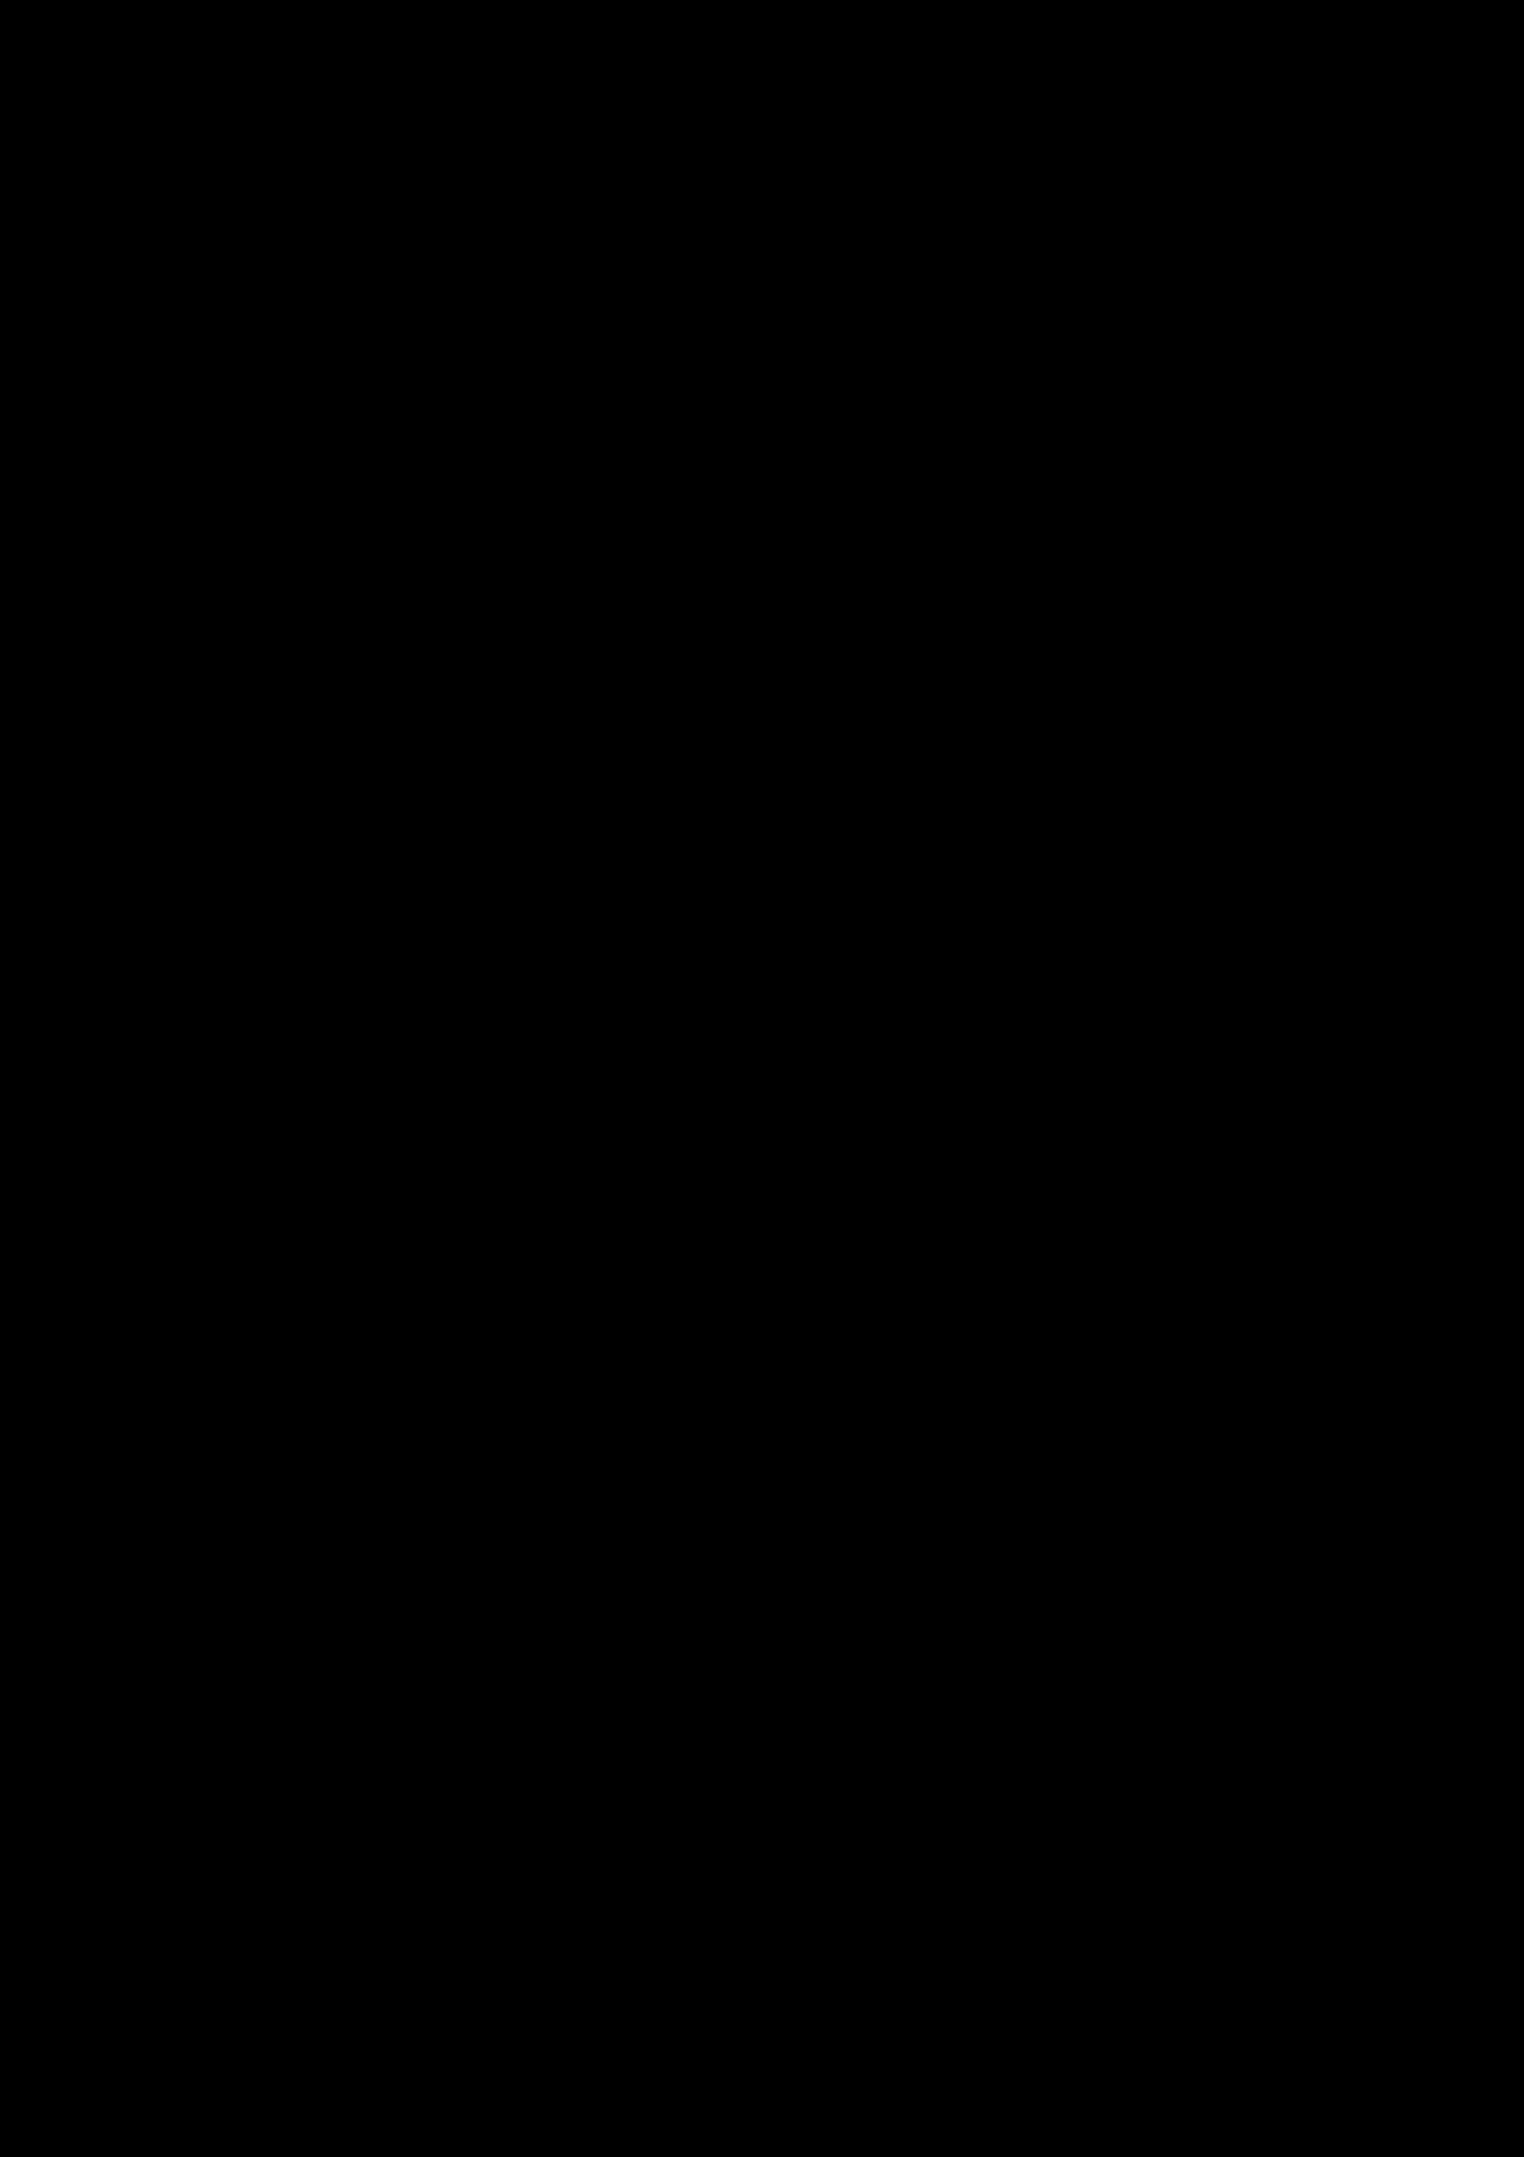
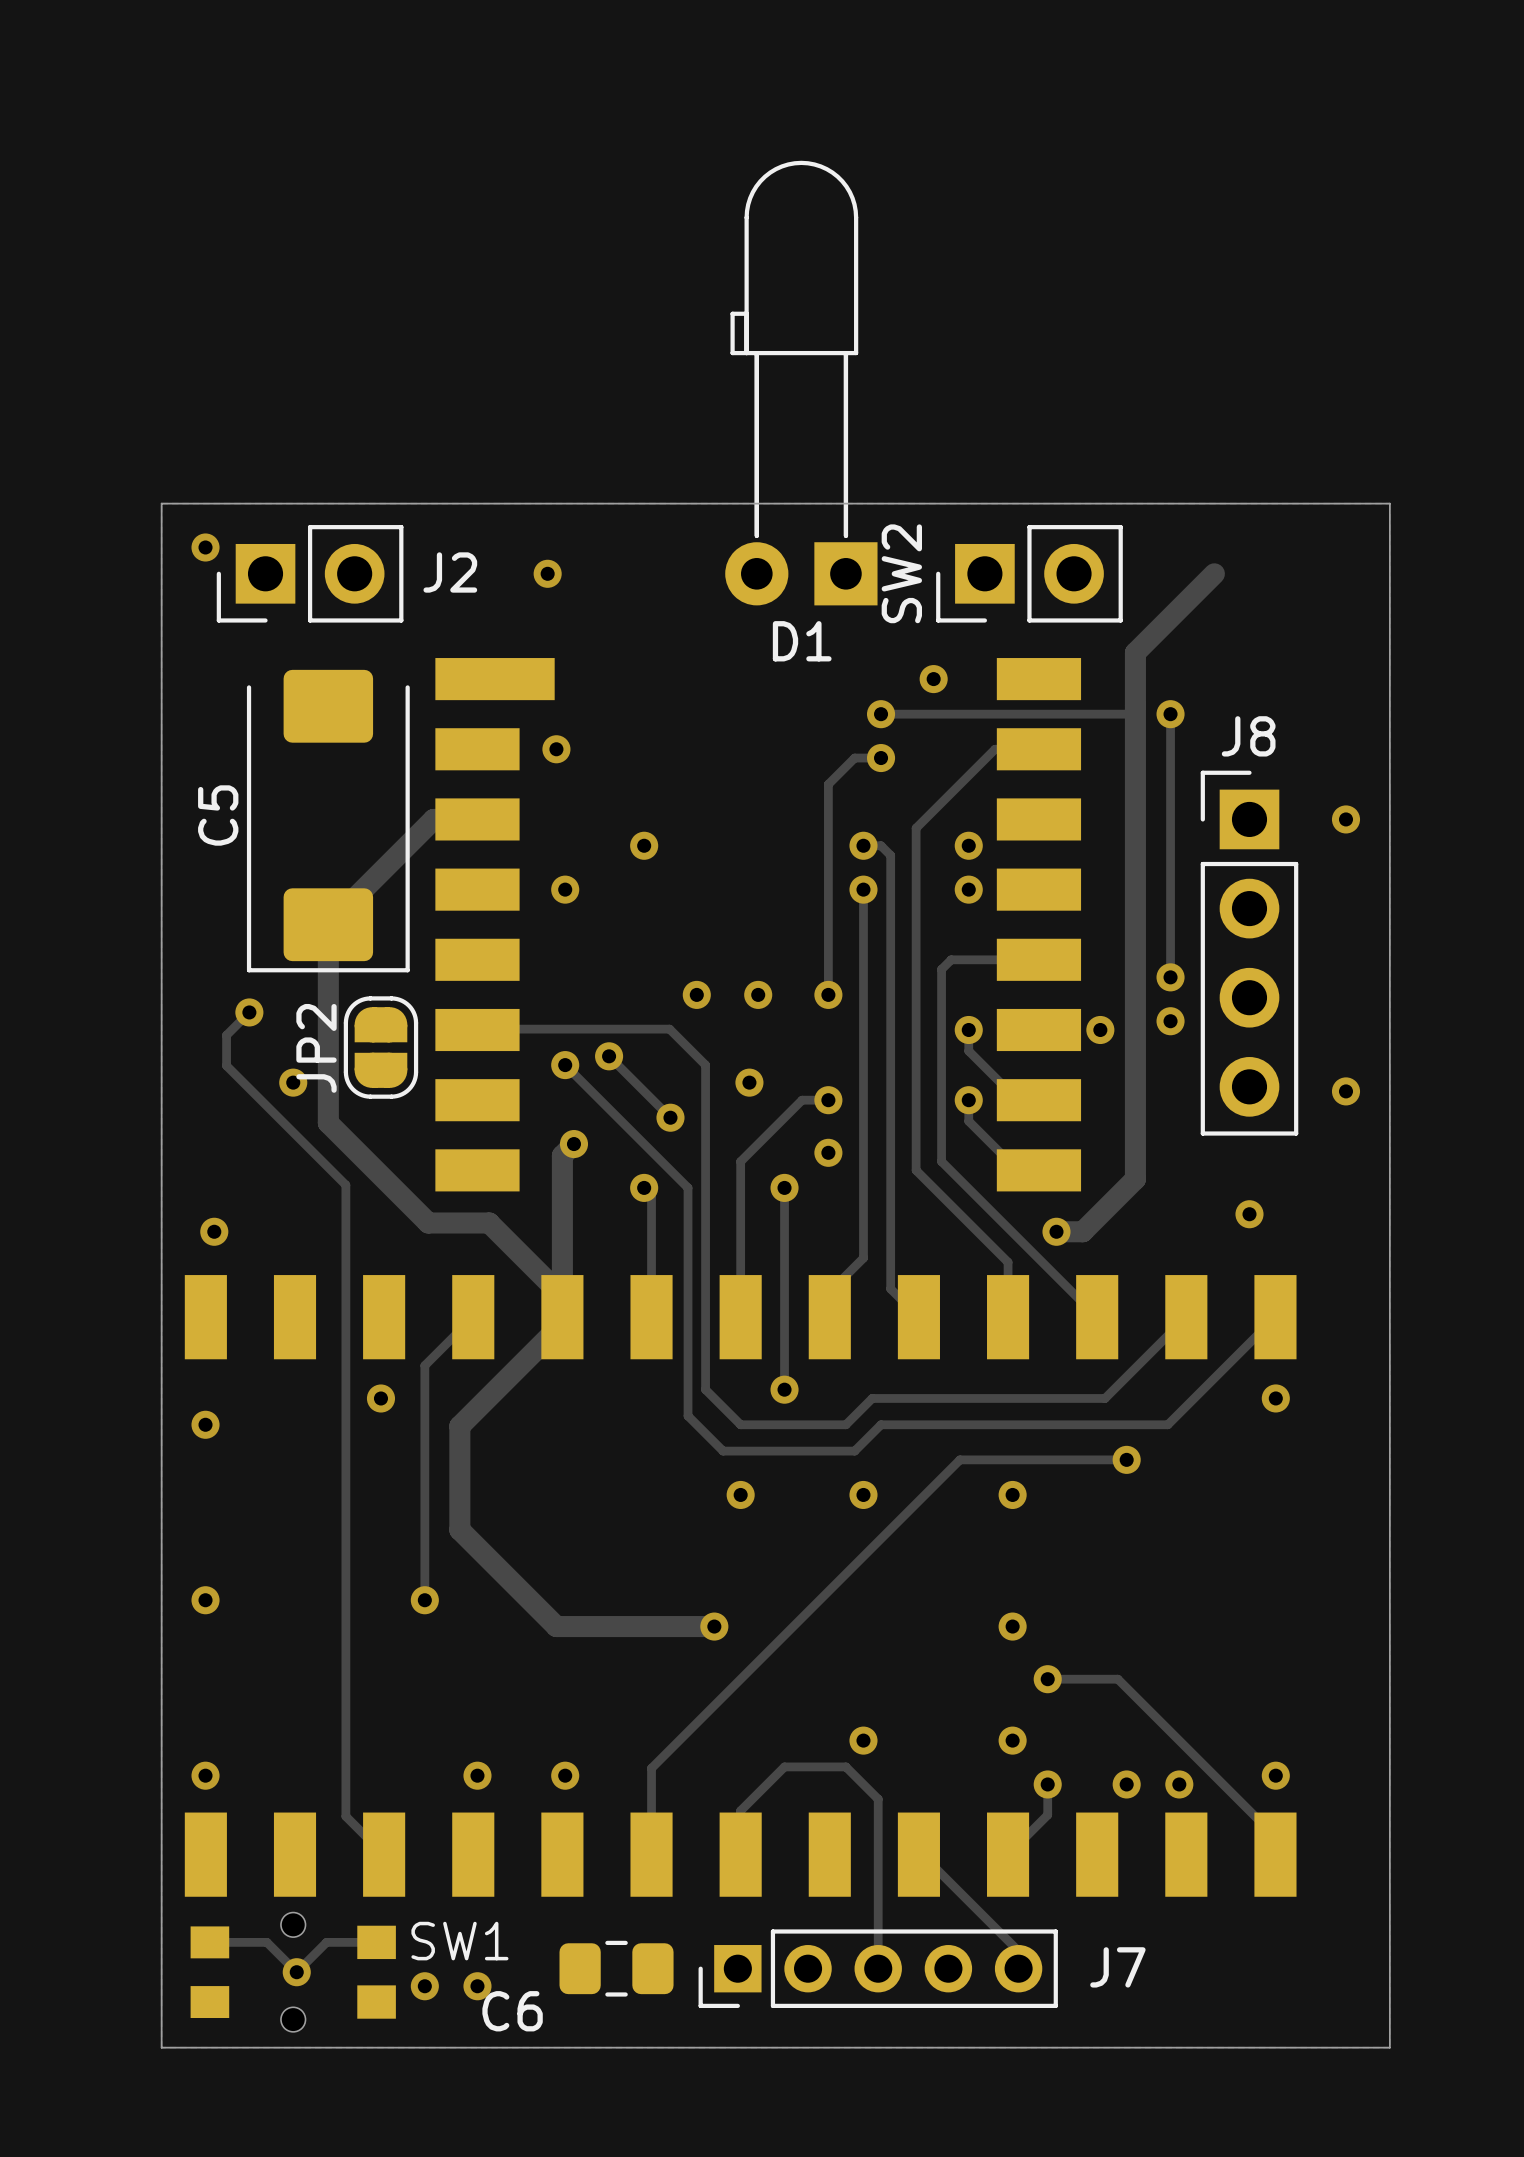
D1: none -> (801, 383)
board edge: none -> (161, 503) (1389, 503) (1389, 2047) (161, 2047) (161, 503)
via: none -> (205, 547)
J2: none -> (310, 573)
via: none -> (547, 573)
SW2: none -> (1029, 573)
track: none -> (1214, 573) (1135, 652) (1135, 1179) (1082, 1231) (1056, 1231)
via: none -> (933, 679)
track: none -> (1135, 705) (1126, 714) (881, 714)
via: none -> (881, 714)
track: none -> (1170, 714) (1170, 977)
via: none -> (1170, 714)
via: none -> (556, 749)
track: none -> (1038, 749) (995, 749) (916, 828) (916, 1170) (1008, 1262) (1008, 1317)
track: none -> (881, 758) (854, 758) (828, 784) (828, 994)
via: none -> (881, 758)
track: none -> (477, 819) (433, 819) (328, 924) (328, 1122) (428, 1223) (489, 1223) (562, 1296)
via: none -> (1346, 819)
C5: none -> (328, 821)
via: none -> (644, 845)
track: none -> (863, 845) (881, 845) (890, 855) (890, 1288) (918, 1317) (918, 1295)
via: none -> (863, 845)
via: none -> (968, 845)
via: none -> (565, 889)
track: none -> (863, 889) (863, 1258) (829, 1291) (829, 1317)
via: none -> (863, 889)
via: none -> (968, 889)
part: none -> (495, 924)
part: none -> (1038, 924)
J8: none -> (1249, 953)
track: none -> (1038, 959) (951, 959) (941, 969) (941, 1161) (1097, 1317)
via: none -> (1170, 977)
via: none -> (696, 994)
via: none -> (758, 994)
via: none -> (828, 994)
track: none -> (249, 1012) (226, 1035) (226, 1065) (345, 1185) (345, 1816) (384, 1854)
via: none -> (249, 1012)
via: none -> (1170, 1021)
track: none -> (477, 1029) (669, 1029) (705, 1065) (705, 1389) (740, 1424) (845, 1424) (872, 1398) (1105, 1398) (1186, 1317)
track: none -> (968, 1029) (968, 1051) (1017, 1100) (1038, 1100)
via: none -> (968, 1029)
via: none -> (1100, 1029)
JP2: none -> (380, 1047)
track: none -> (609, 1056) (670, 1117)
via: none -> (609, 1056)
track: none -> (565, 1065) (688, 1187) (688, 1416) (723, 1451) (854, 1451) (881, 1424) (1167, 1424) (1275, 1317)
via: none -> (565, 1065)
via: none -> (293, 1082)
via: none -> (749, 1082)
via: none -> (1346, 1091)
track: none -> (828, 1100) (802, 1100) (740, 1161) (740, 1317)
via: none -> (828, 1100)
track: none -> (968, 1100) (968, 1121) (1017, 1170) (1038, 1170)
via: none -> (968, 1100)
via: none -> (670, 1117)
track: none -> (573, 1144) (562, 1155) (562, 1323) (459, 1426) (459, 1529) (556, 1626) (714, 1626)
via: none -> (573, 1144)
via: none -> (828, 1152)
track: none -> (644, 1187) (651, 1195) (651, 1317)
via: none -> (644, 1187)
track: none -> (784, 1187) (784, 1389)
via: none -> (784, 1187)
via: none -> (1249, 1214)
via: none -> (214, 1231)
via: none -> (1056, 1231)
track: none -> (473, 1317) (424, 1365) (424, 1600)
part: none -> (740, 1317)
via: none -> (784, 1389)
via: none -> (380, 1398)
via: none -> (1275, 1398)
via: none -> (205, 1424)
track: none -> (1126, 1459) (959, 1459) (651, 1768) (651, 1854)
via: none -> (1126, 1459)
via: none -> (740, 1494)
via: none -> (863, 1494)
via: none -> (1012, 1494)
via: none -> (205, 1600)
via: none -> (424, 1600)
via: none -> (714, 1626)
via: none -> (1012, 1626)
track: none -> (1047, 1679) (1117, 1679) (1275, 1836) (1275, 1854)
via: none -> (1047, 1679)
via: none -> (863, 1740)
via: none -> (1012, 1740)
via: none -> (205, 1775)
via: none -> (477, 1775)
via: none -> (565, 1775)
via: none -> (1275, 1775)
track: none -> (1047, 1784) (1047, 1815) (1008, 1854)
via: none -> (1047, 1784)
via: none -> (1126, 1784)
via: none -> (1179, 1784)
track: none -> (740, 1854) (740, 1810) (784, 1766) (845, 1766) (878, 1799) (878, 1968) (872, 1962)
part: none -> (740, 1854)
track: none -> (918, 1854) (922, 1854) (1018, 1951)
track: none -> (209, 1942) (266, 1942) (296, 1972) (326, 1942) (376, 1942)
C6: none -> (616, 1968)
J7: none -> (878, 1968)
SW1: none -> (293, 1972)
via: none -> (296, 1972)
via: none -> (424, 1986)
via: none -> (477, 1986)

